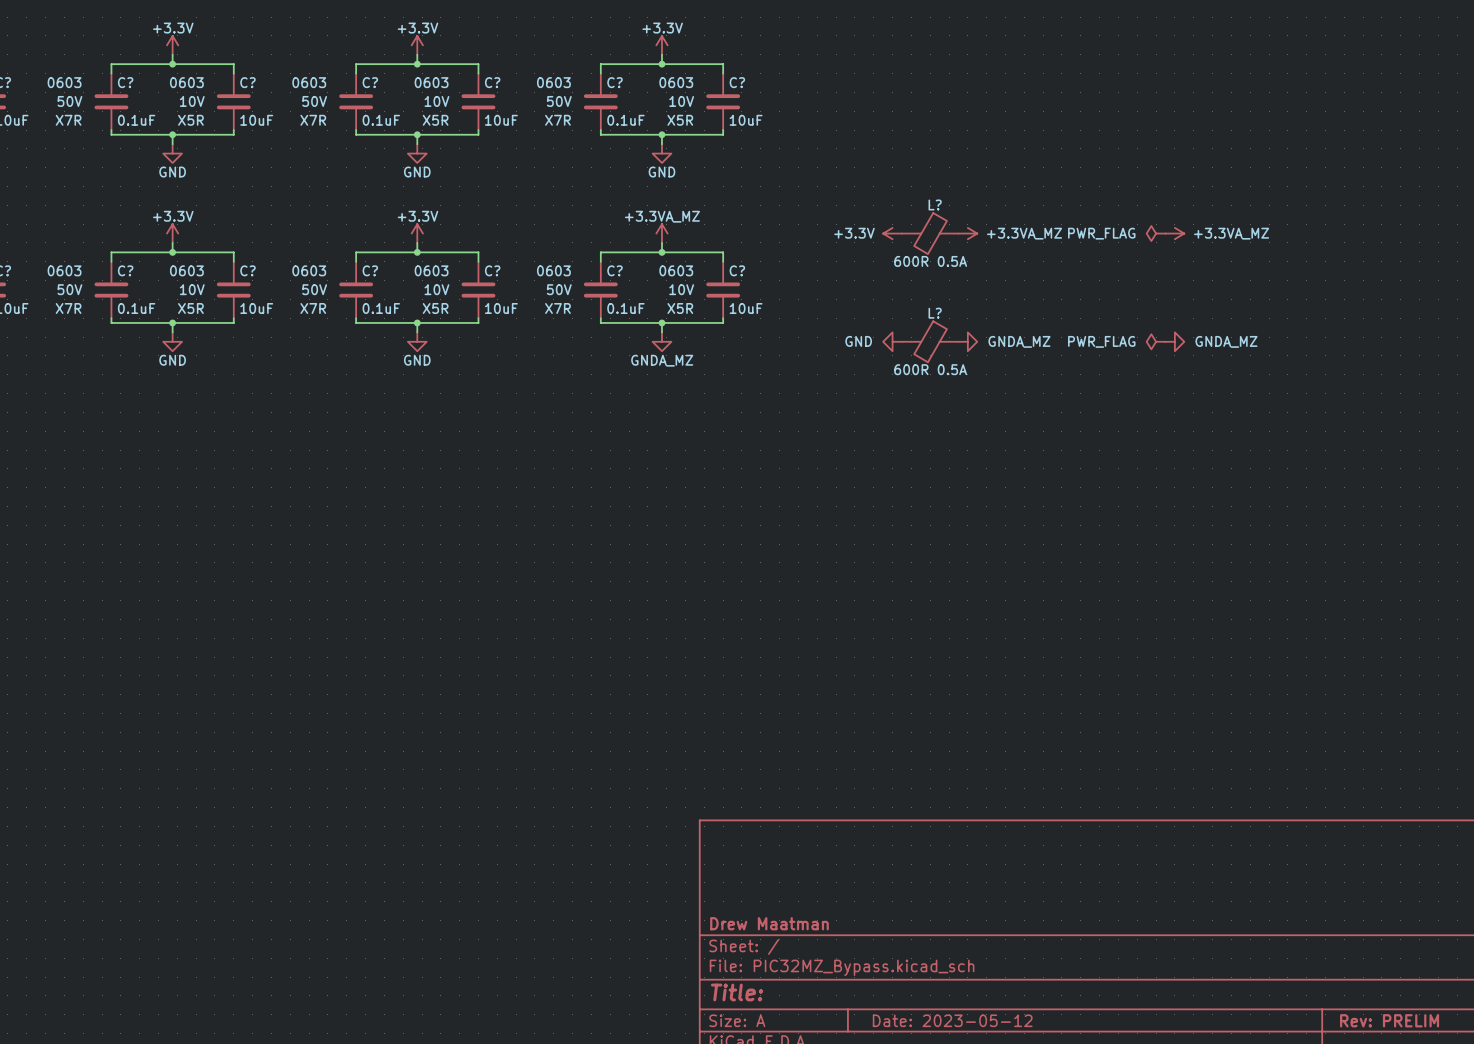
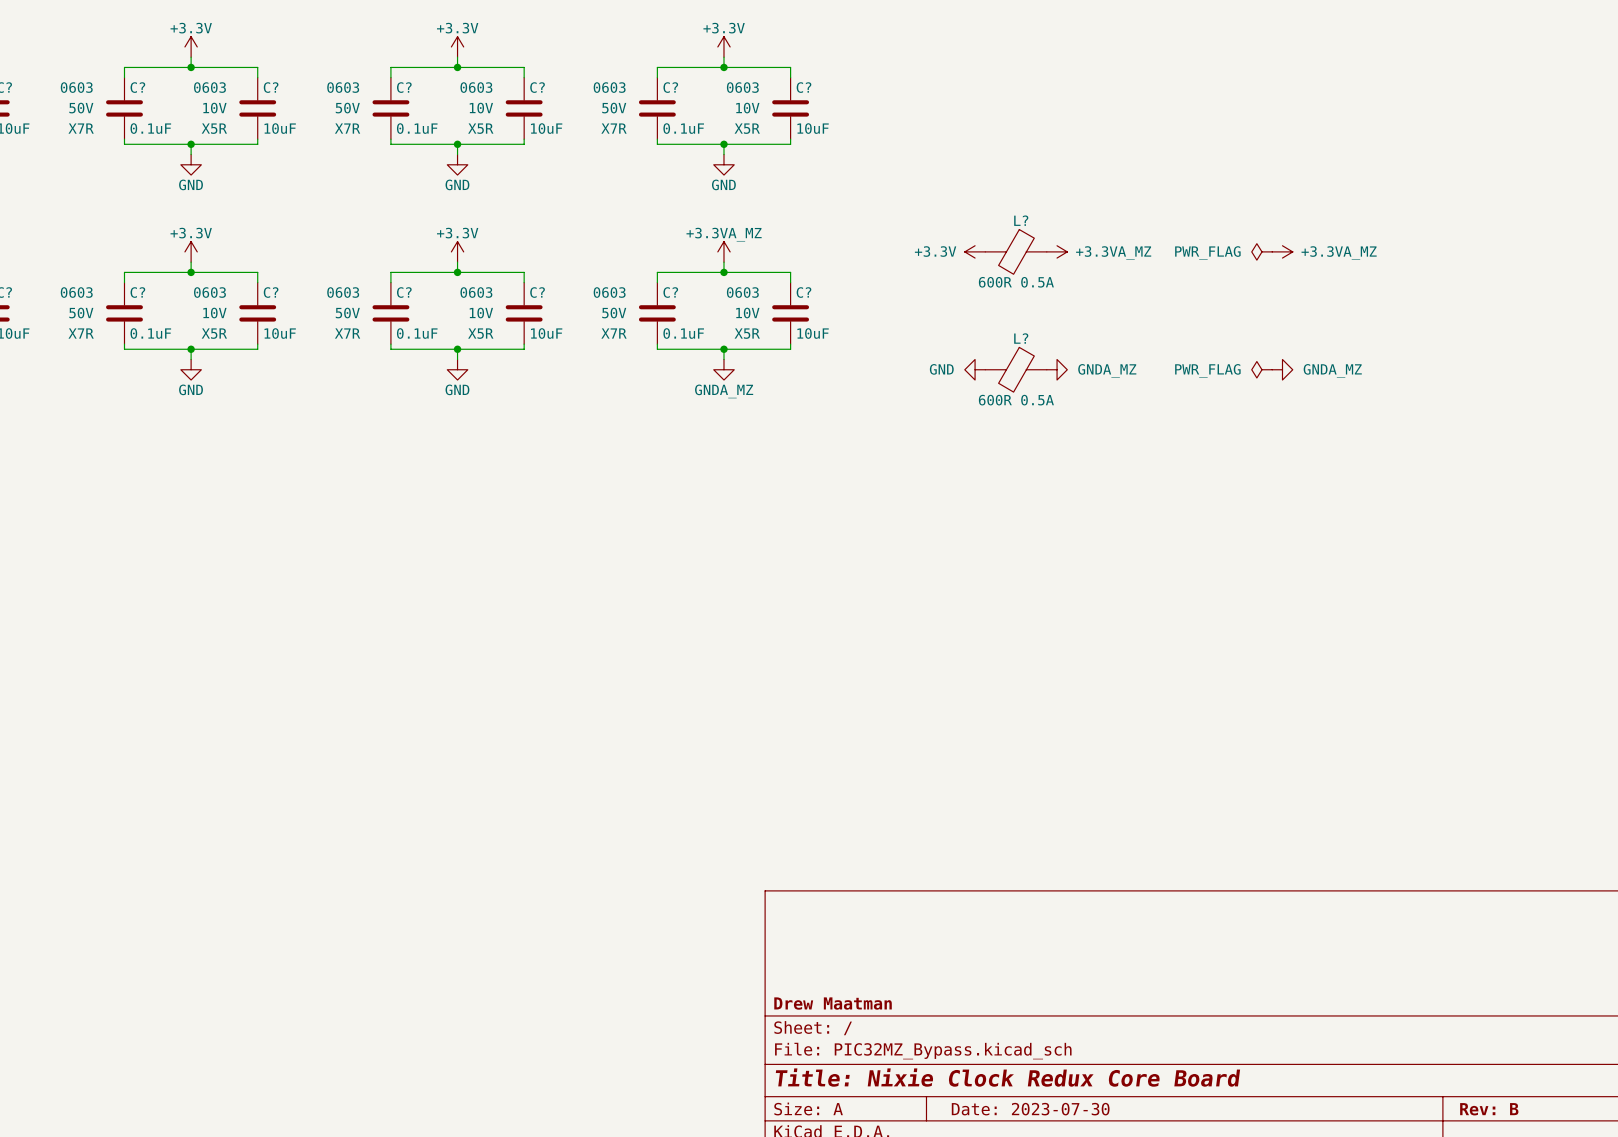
title block: Title: (737, 992) -> Title: Nixie Clock Redux Core Board (1007, 1077)
title block: Date: 2023-05-12 (952, 1020) -> Date: 2023-07-30 (1030, 1109)
title block: Rev: PRELIM (1389, 1020) -> Rev: B (1489, 1109)

